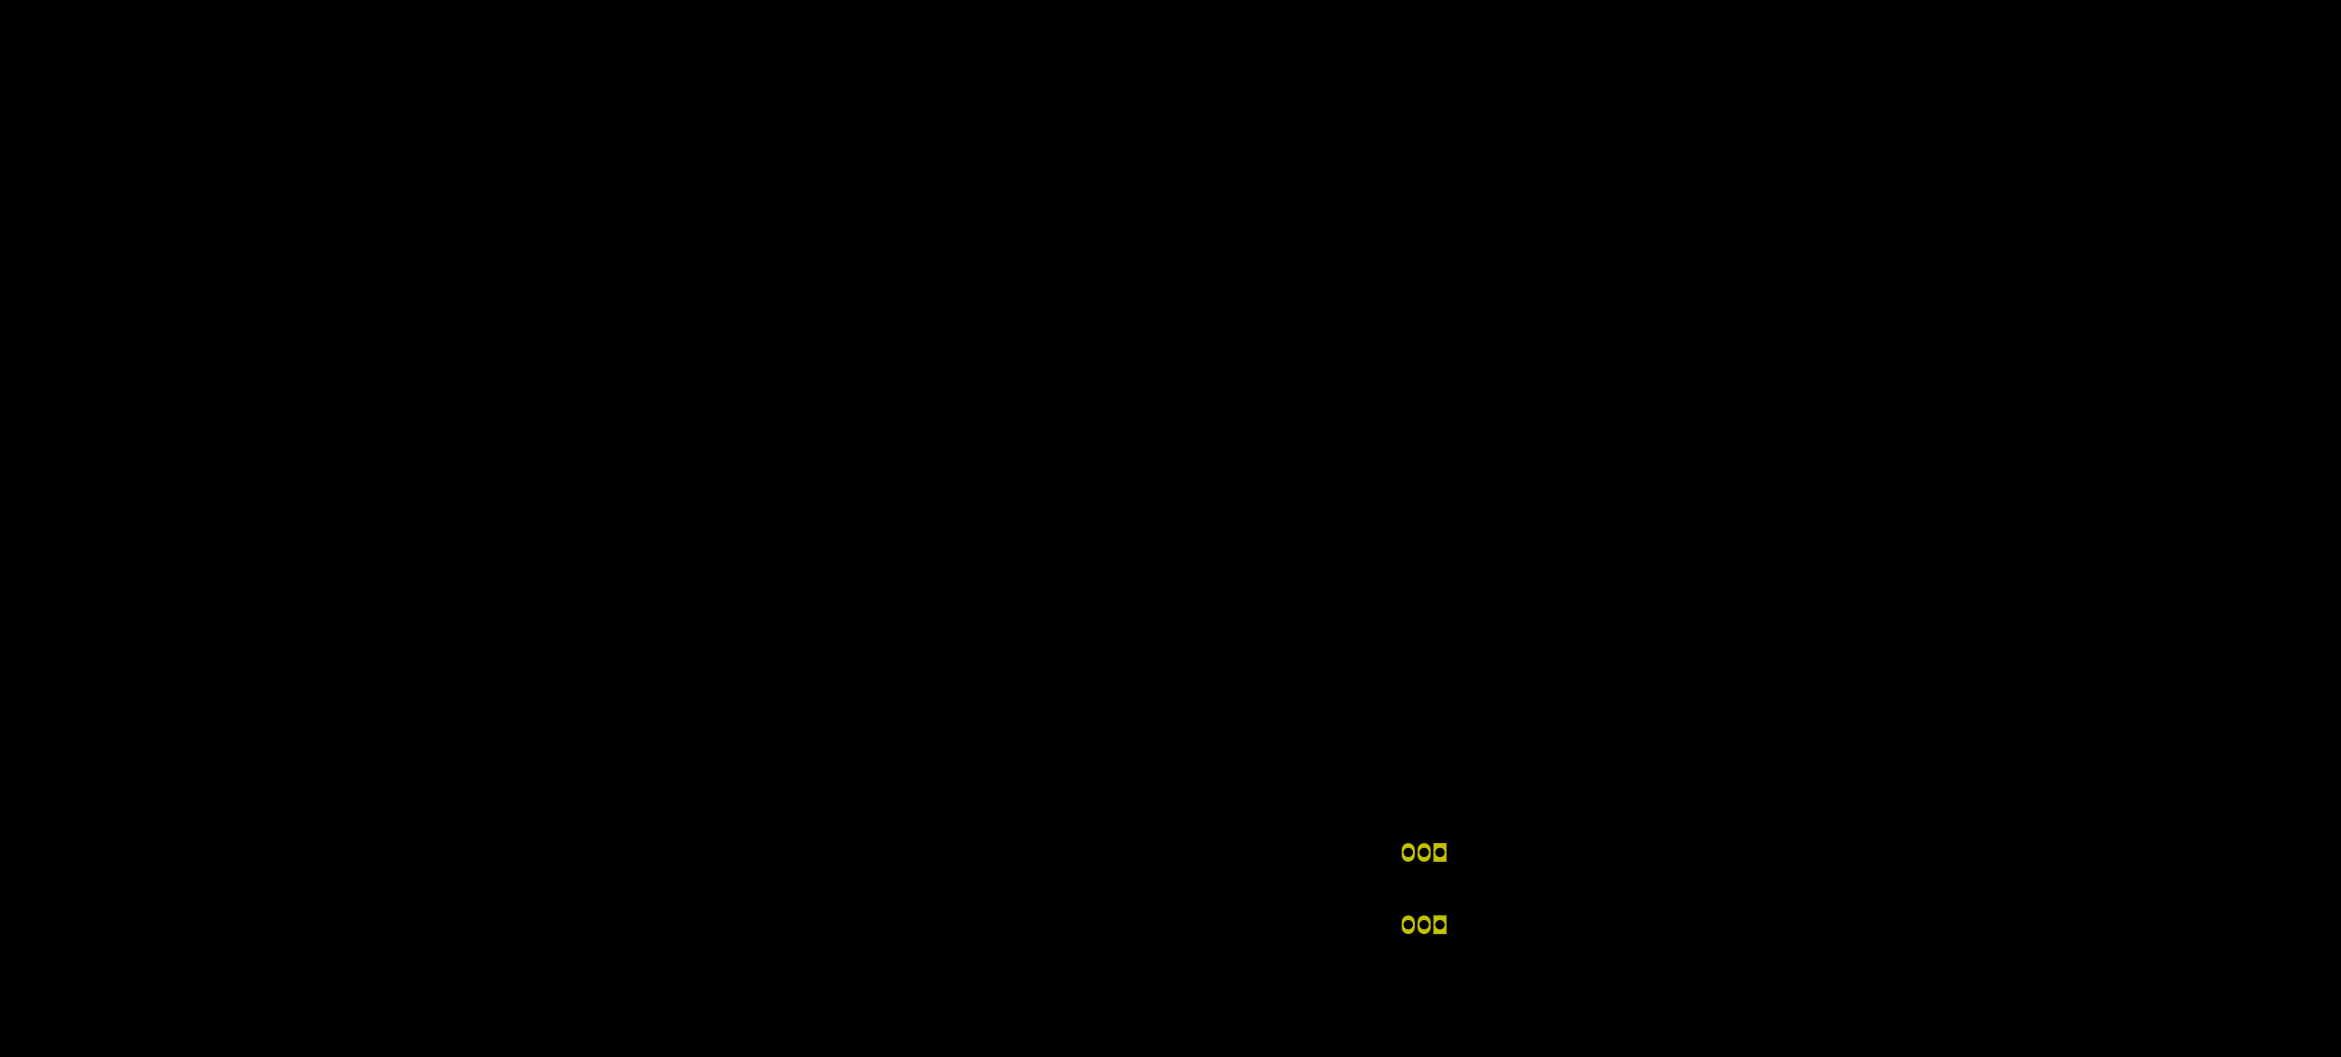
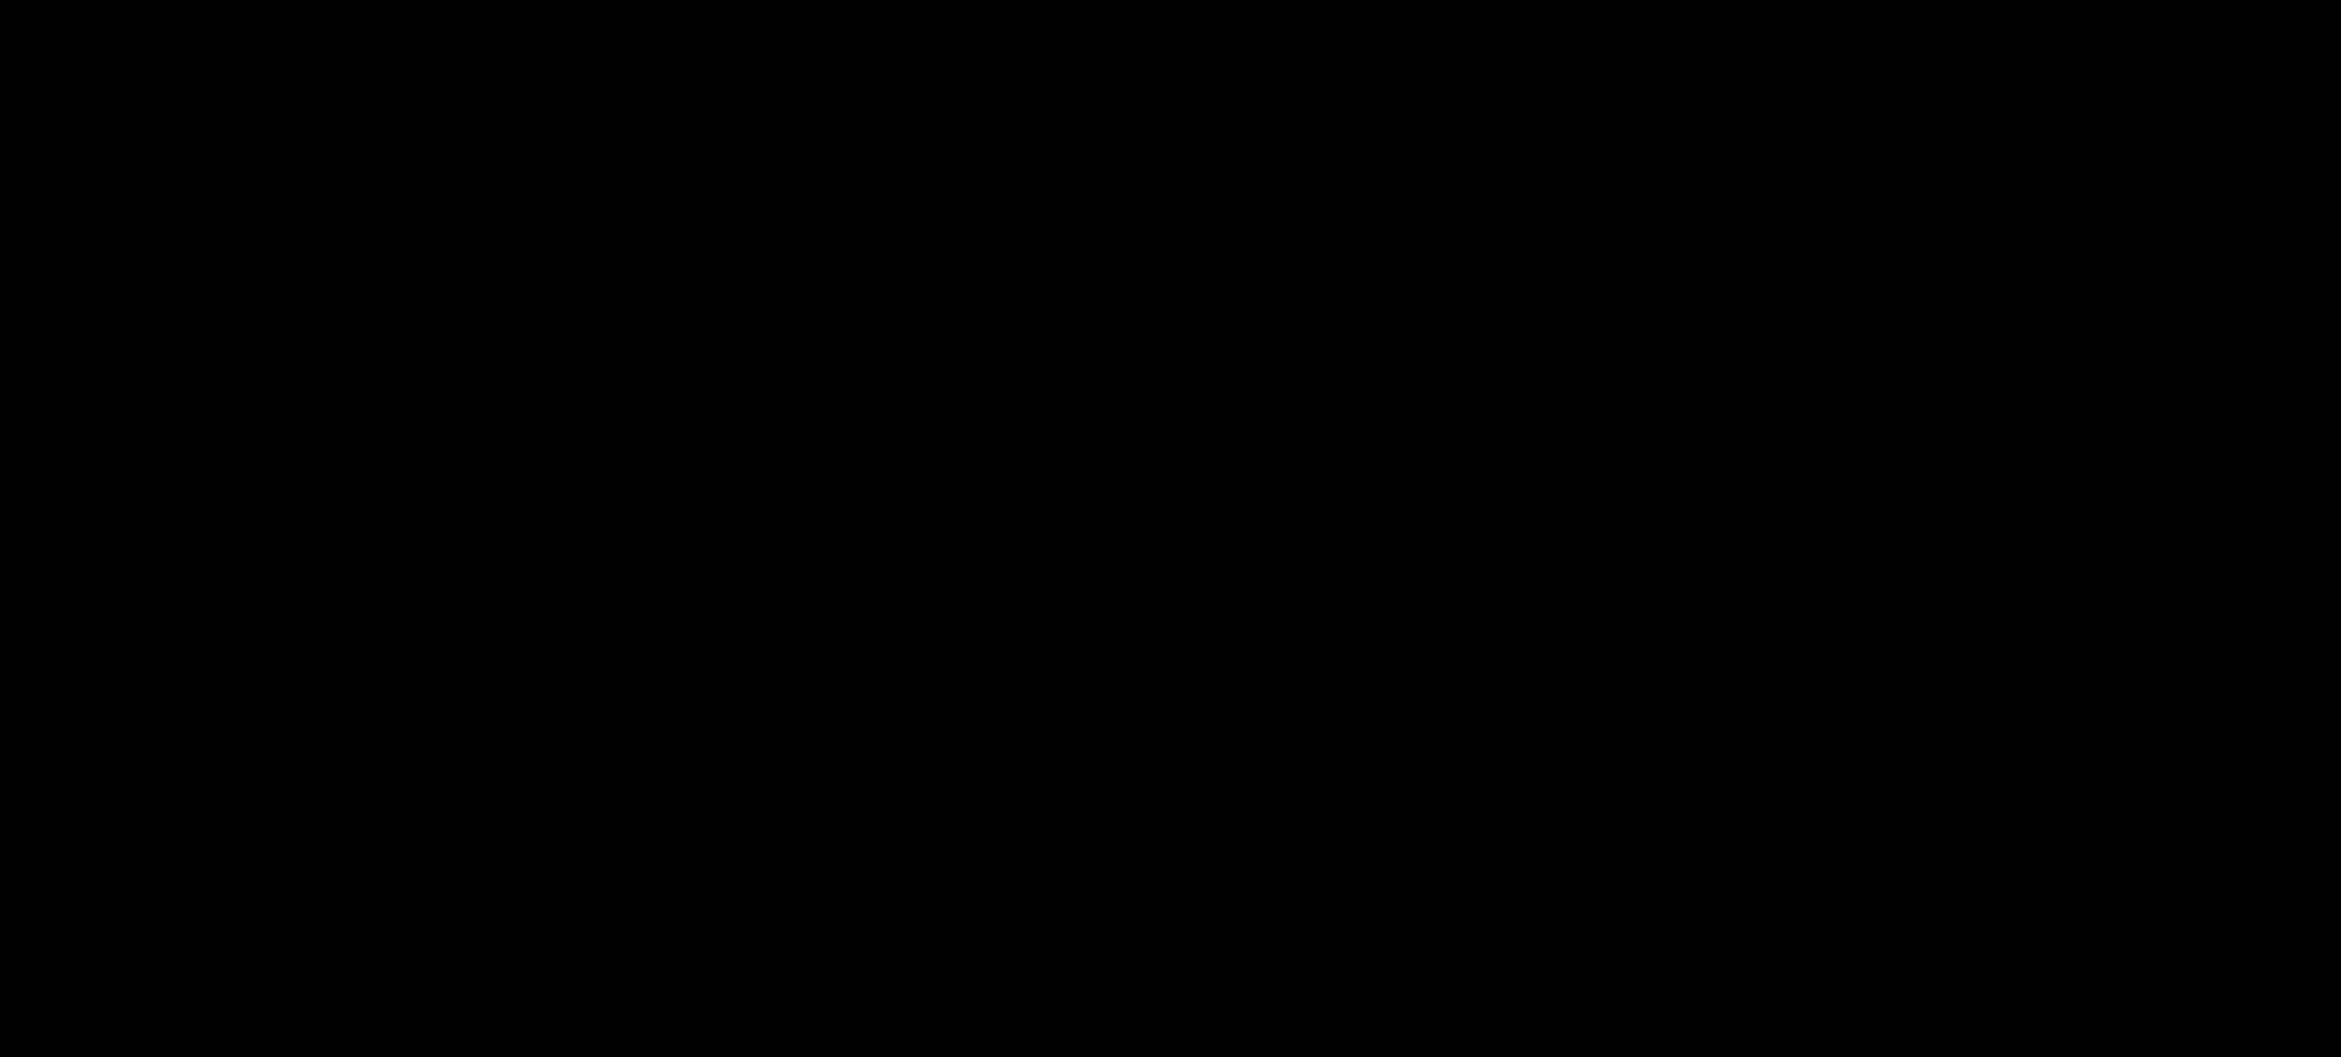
part: (1424, 852) -> none
part: (1424, 924) -> none

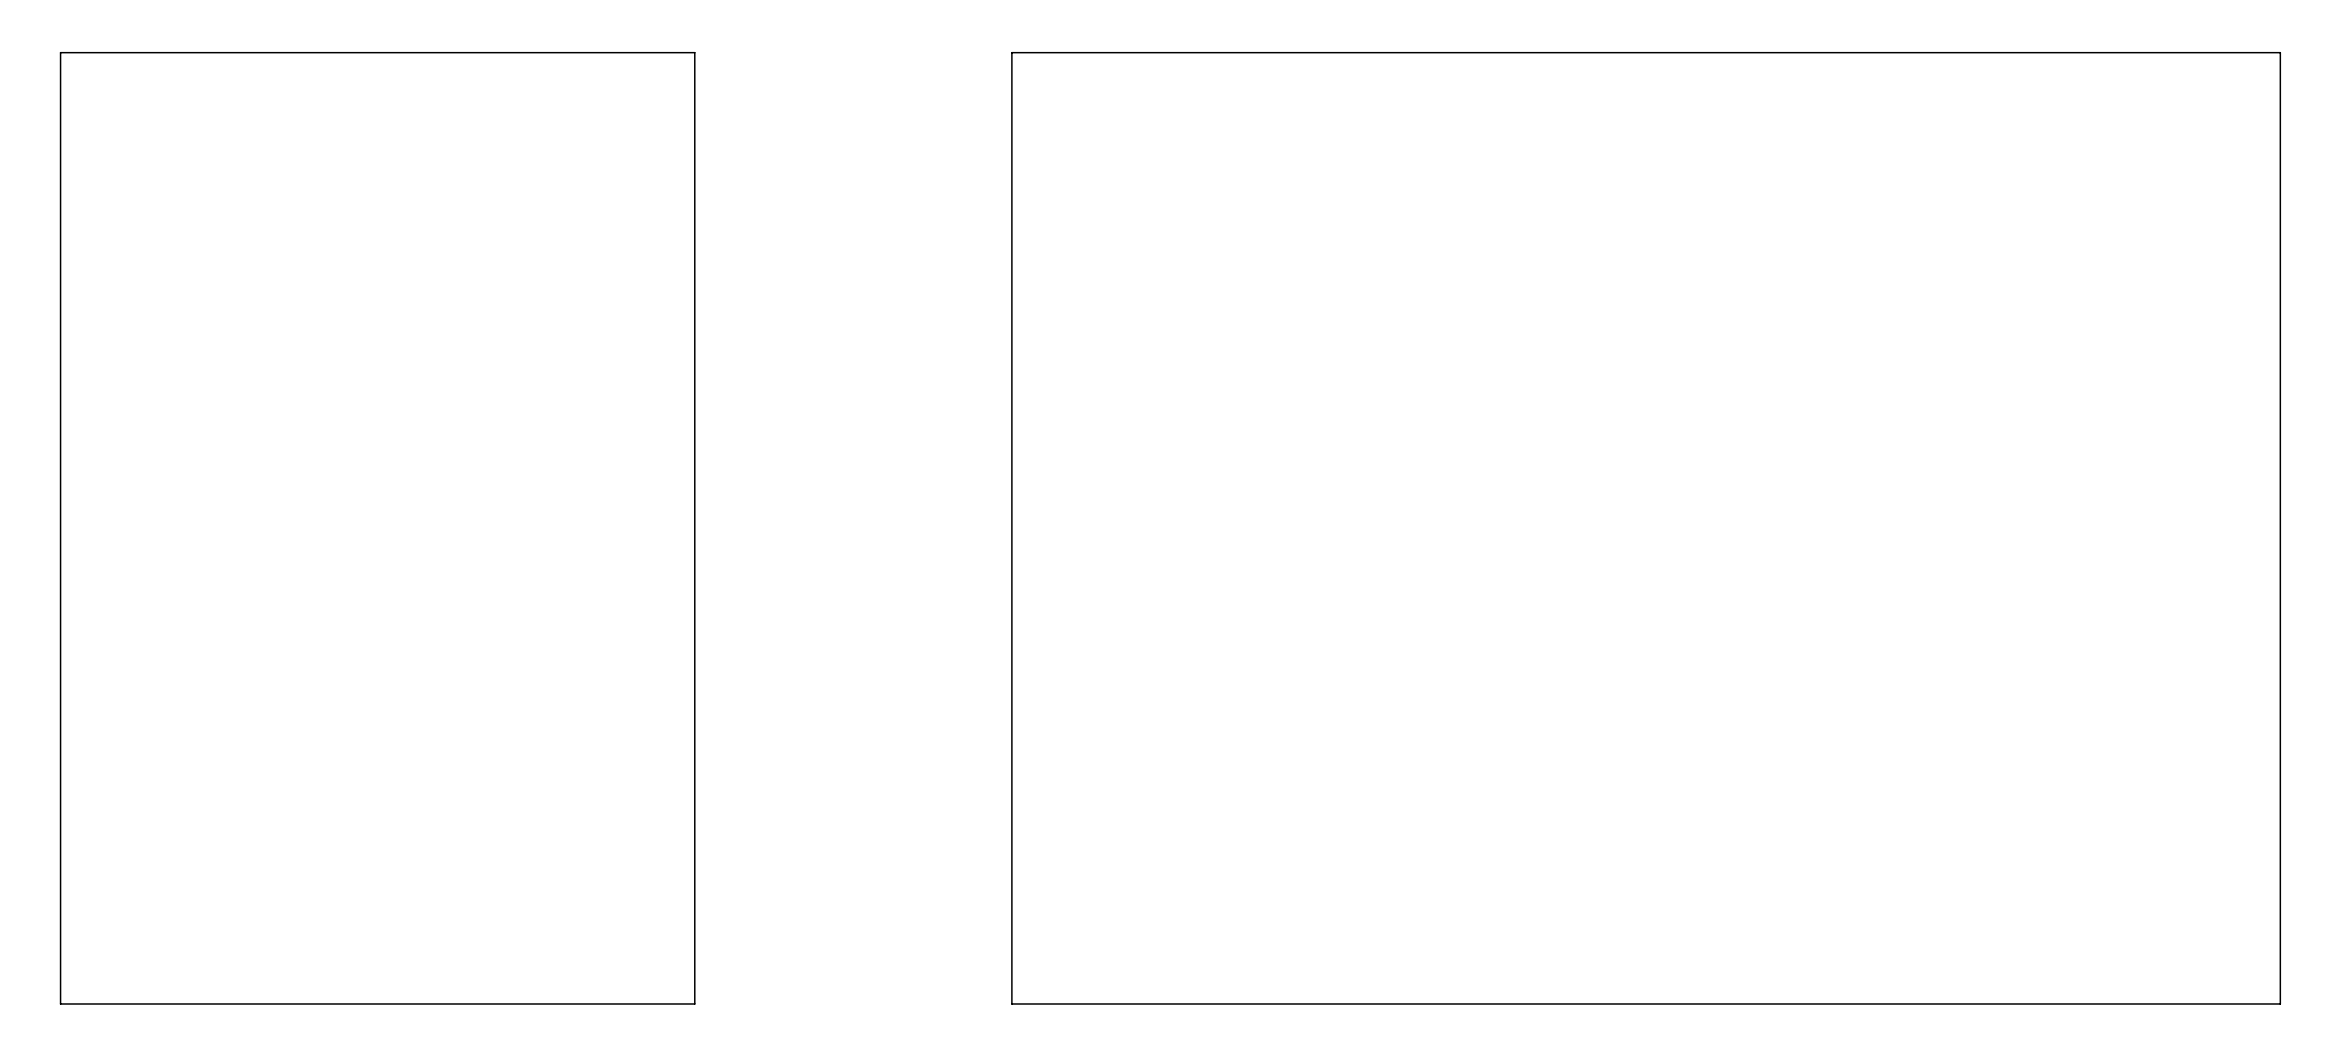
board edge: none -> (694, 52) (60, 52) (60, 1003) (694, 1003) (694, 52)
board edge: none -> (2280, 52) (1011, 52) (1011, 1003) (2280, 1003) (2280, 52)

